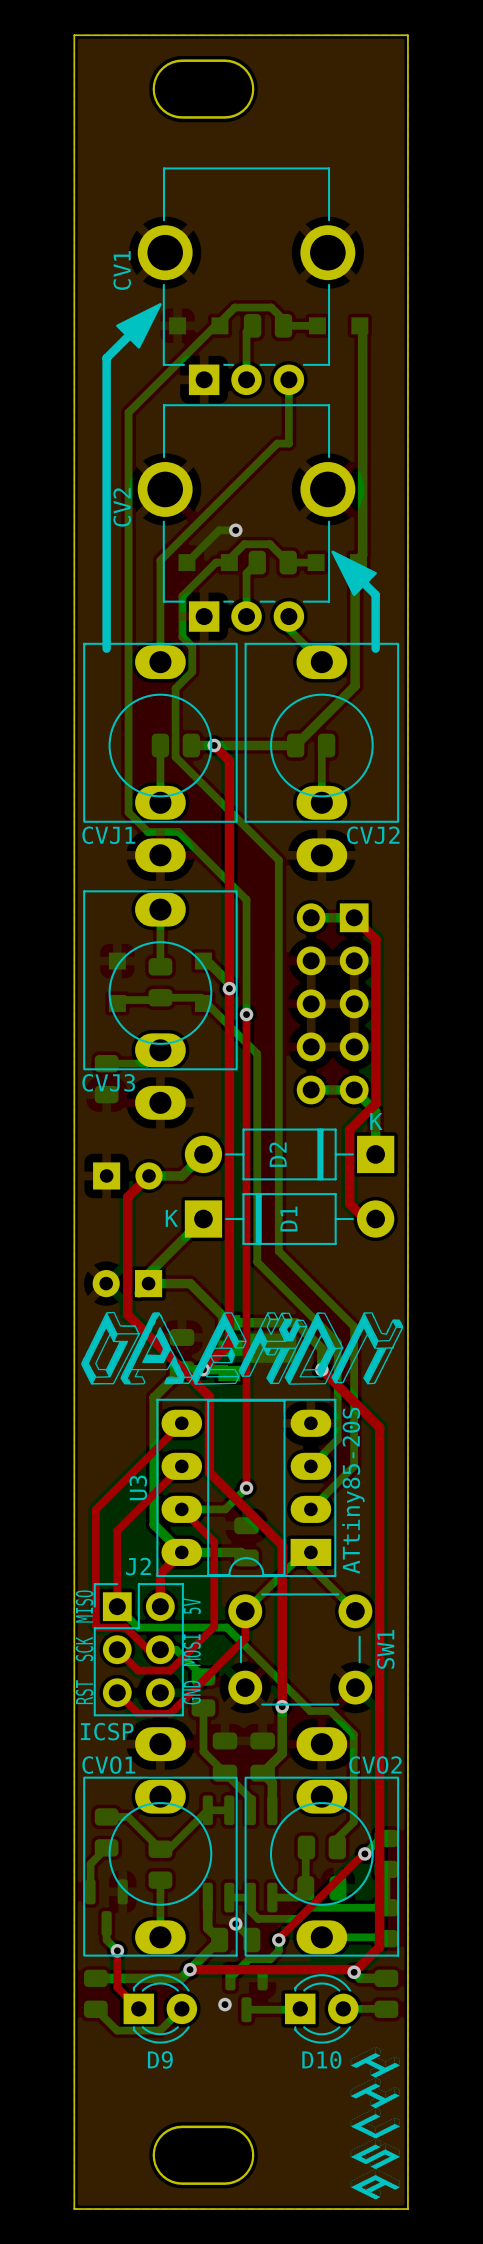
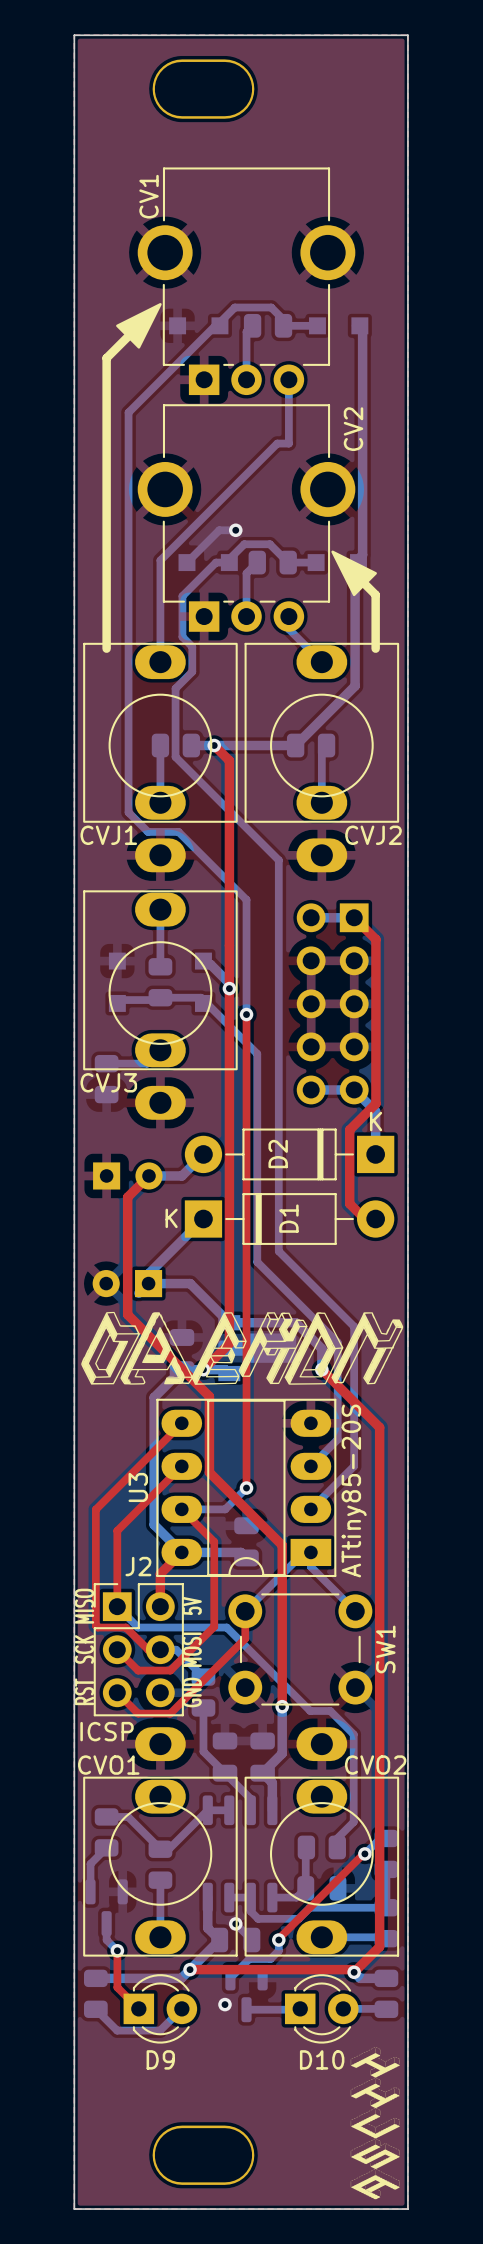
CV1 name position: CV1 (122, 270) -> CV1 (149, 196)
CV2 name position: CV2 (122, 507) -> CV2 (353, 429)

